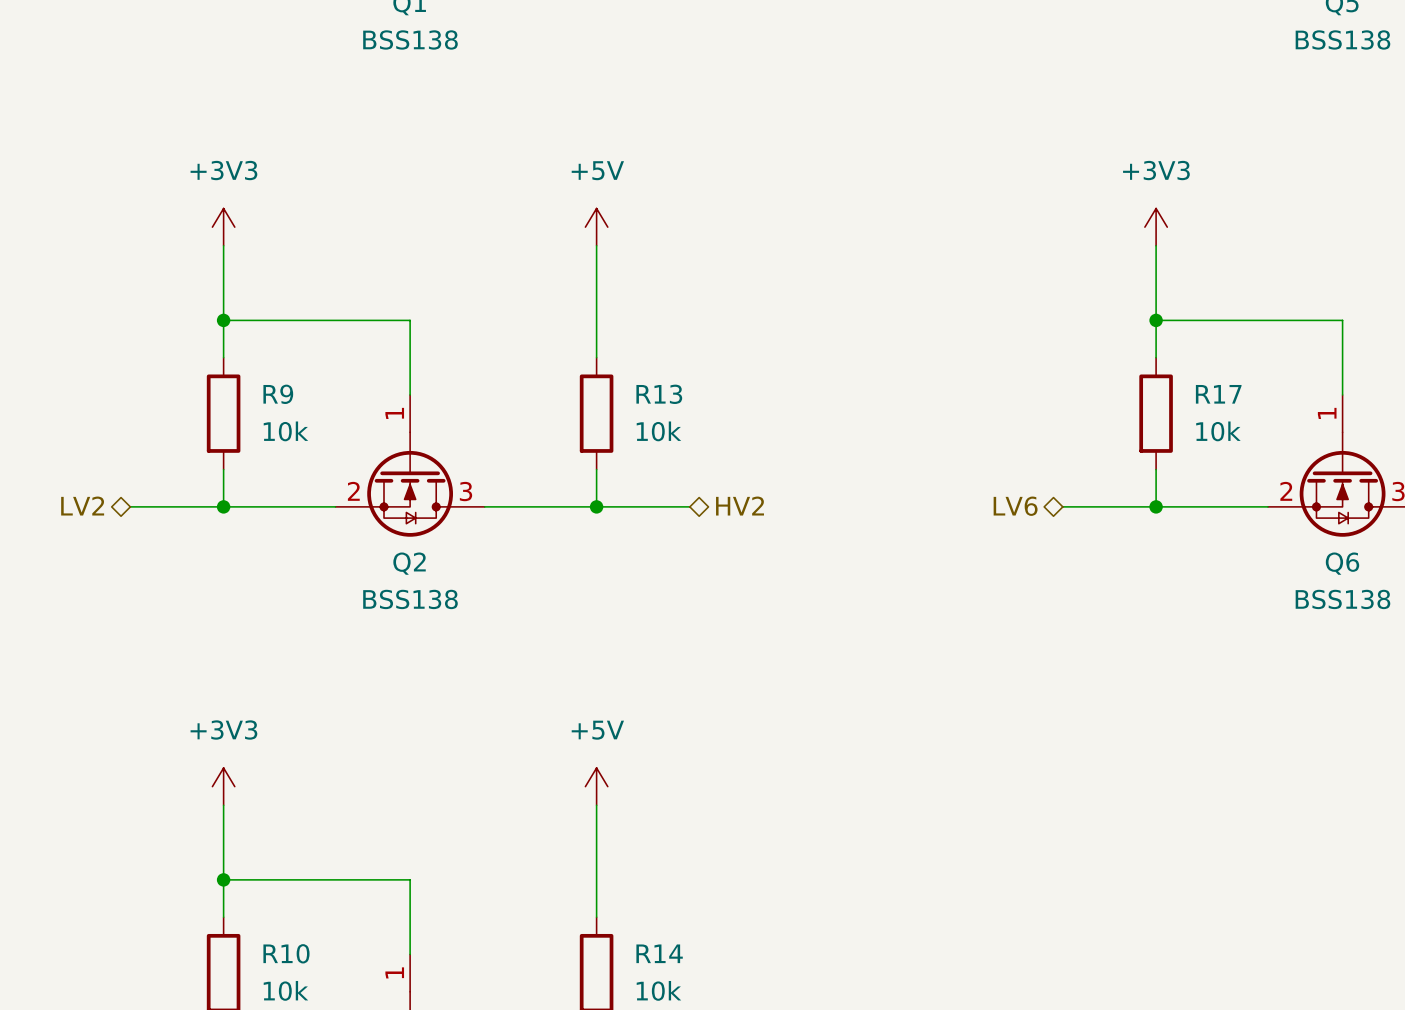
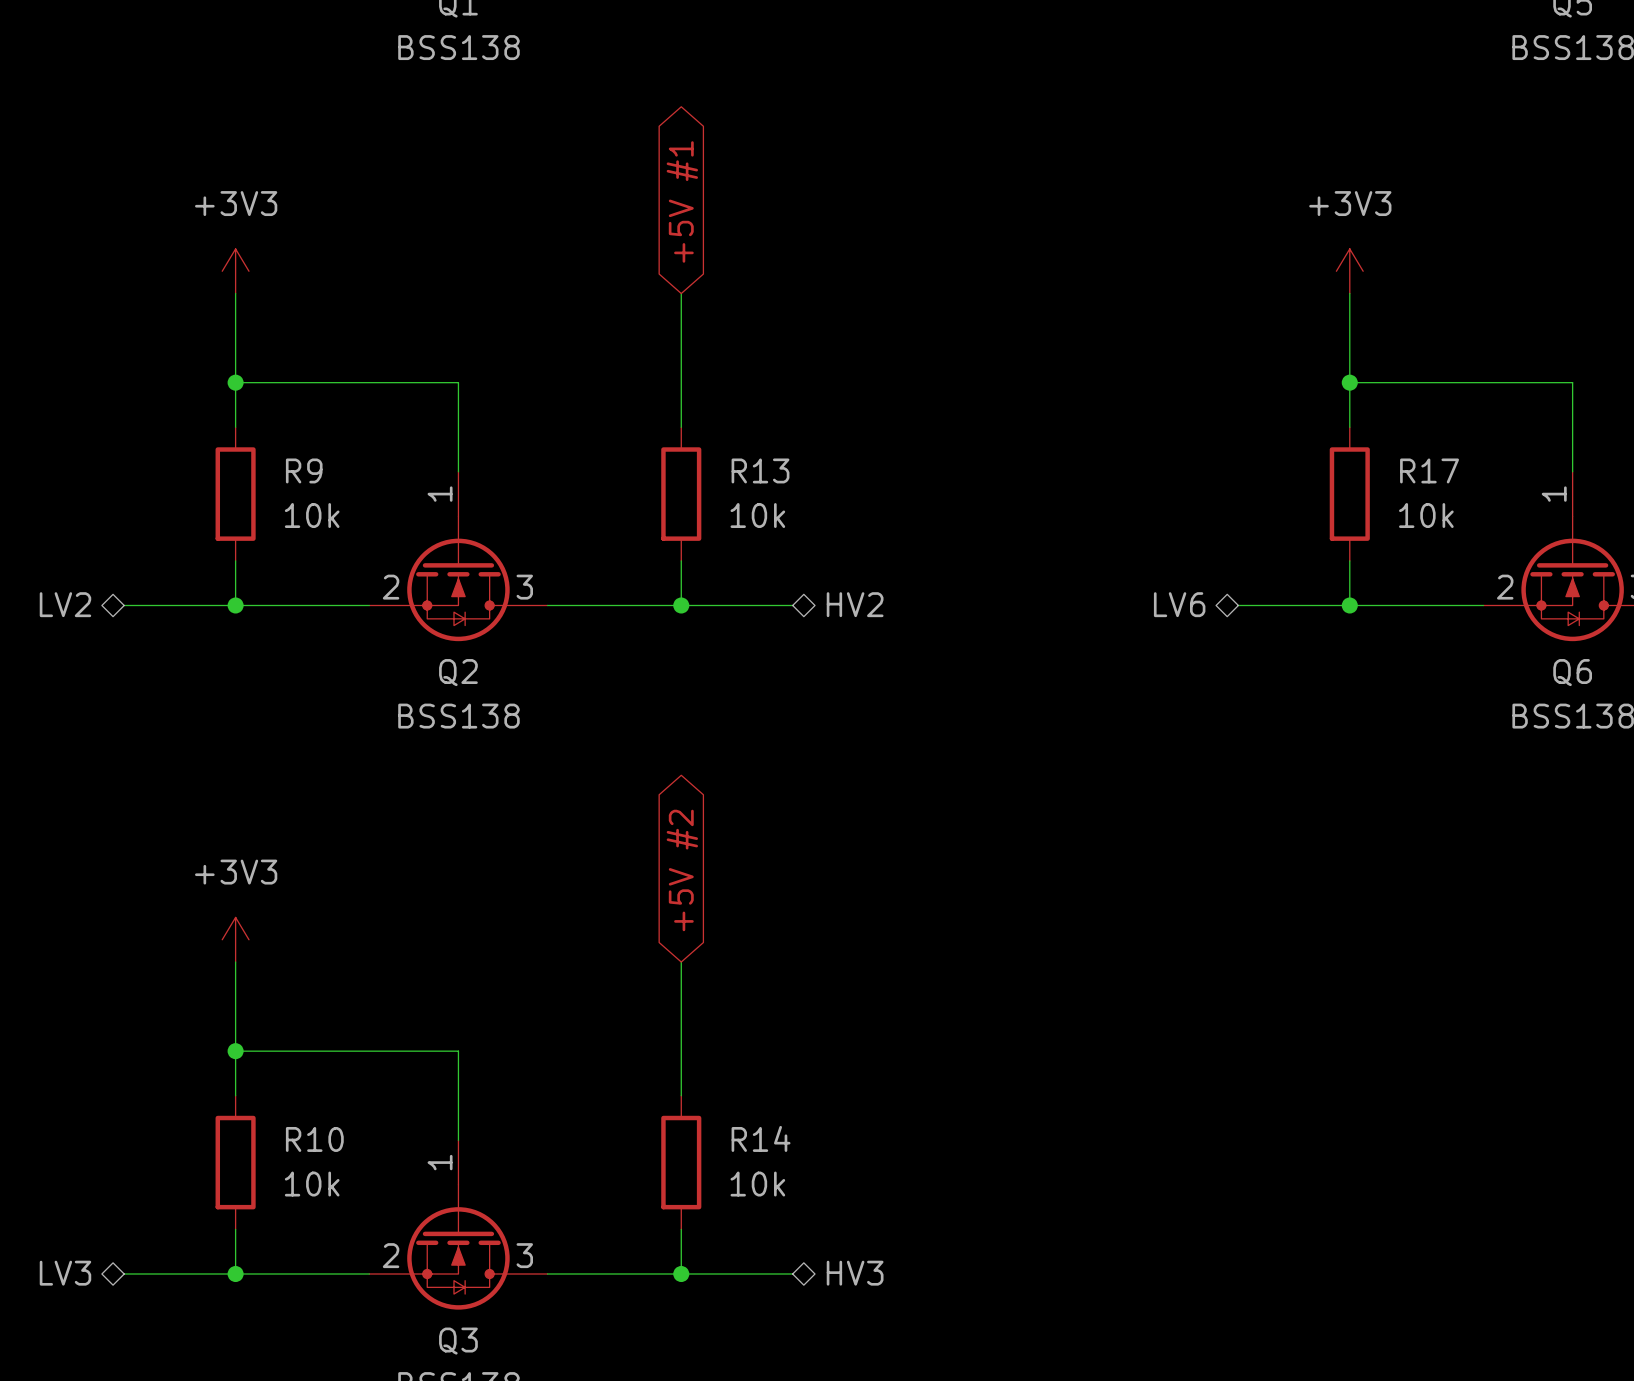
global label: none -> +5V #1 (682, 201)
power symbol: +5V (596, 227) -> none
global label: none -> +5V #2 (682, 870)
power symbol: +5V (596, 786) -> none

